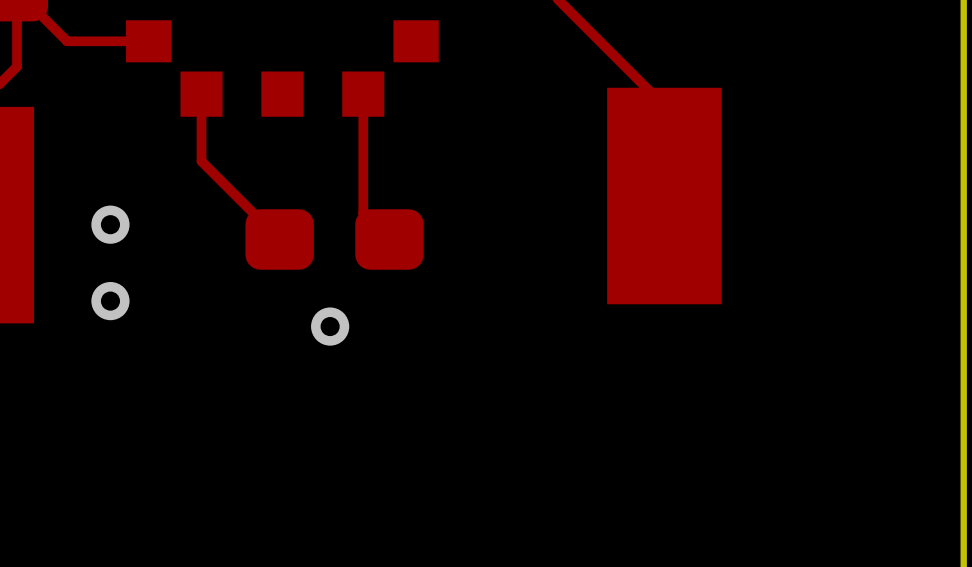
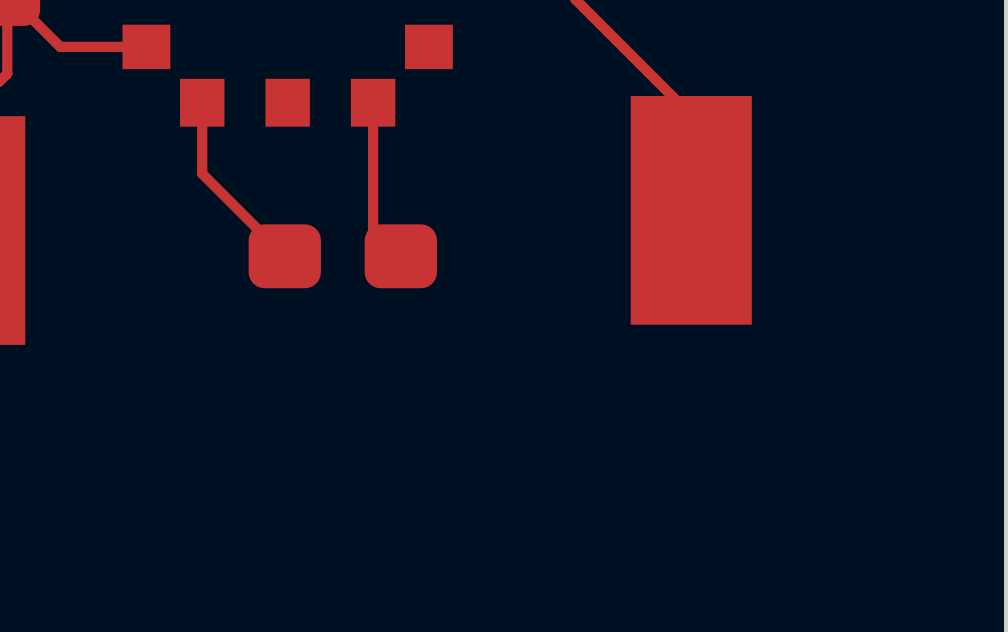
via: (110, 224) -> none
via: (110, 301) -> none
via: (330, 326) -> none

